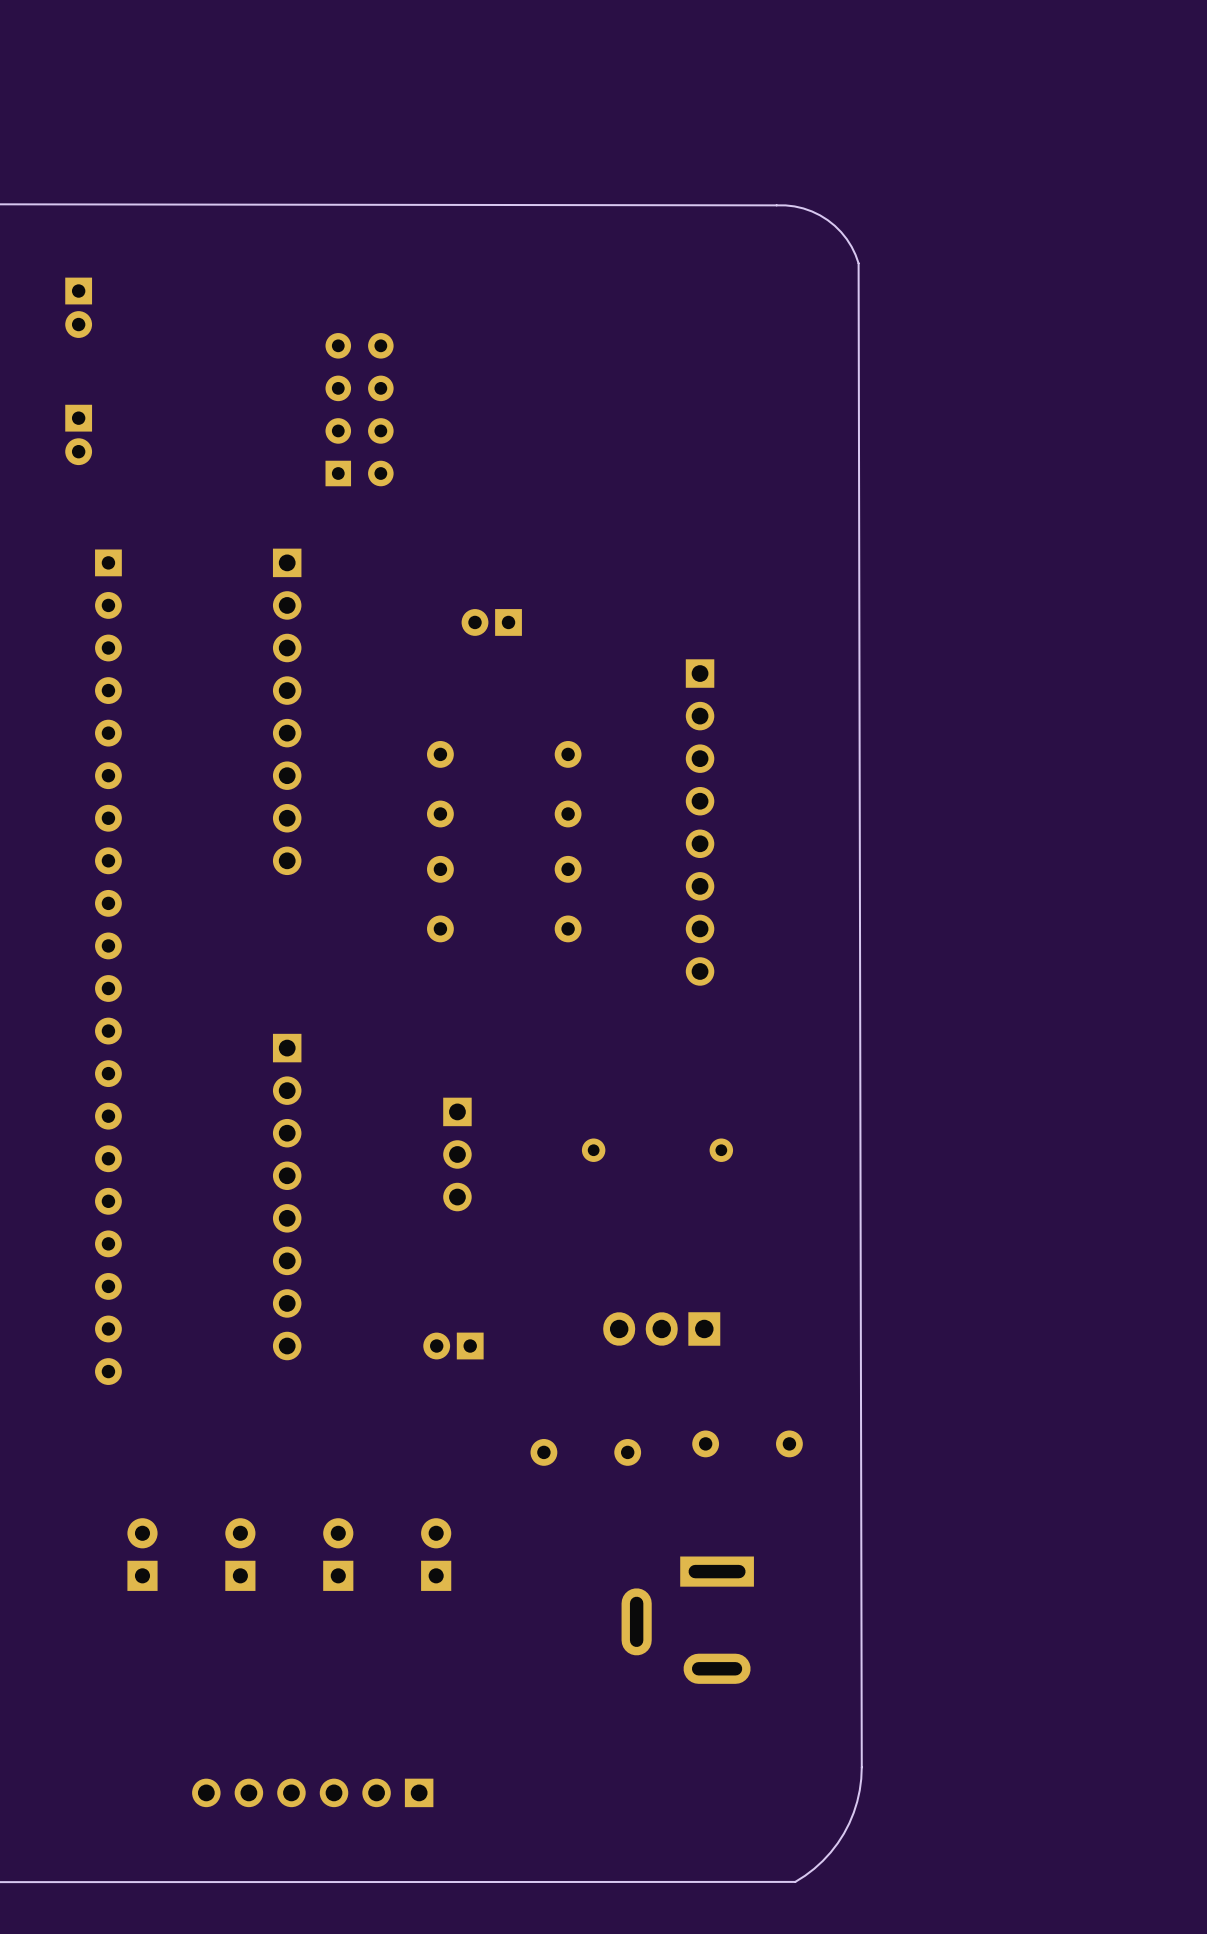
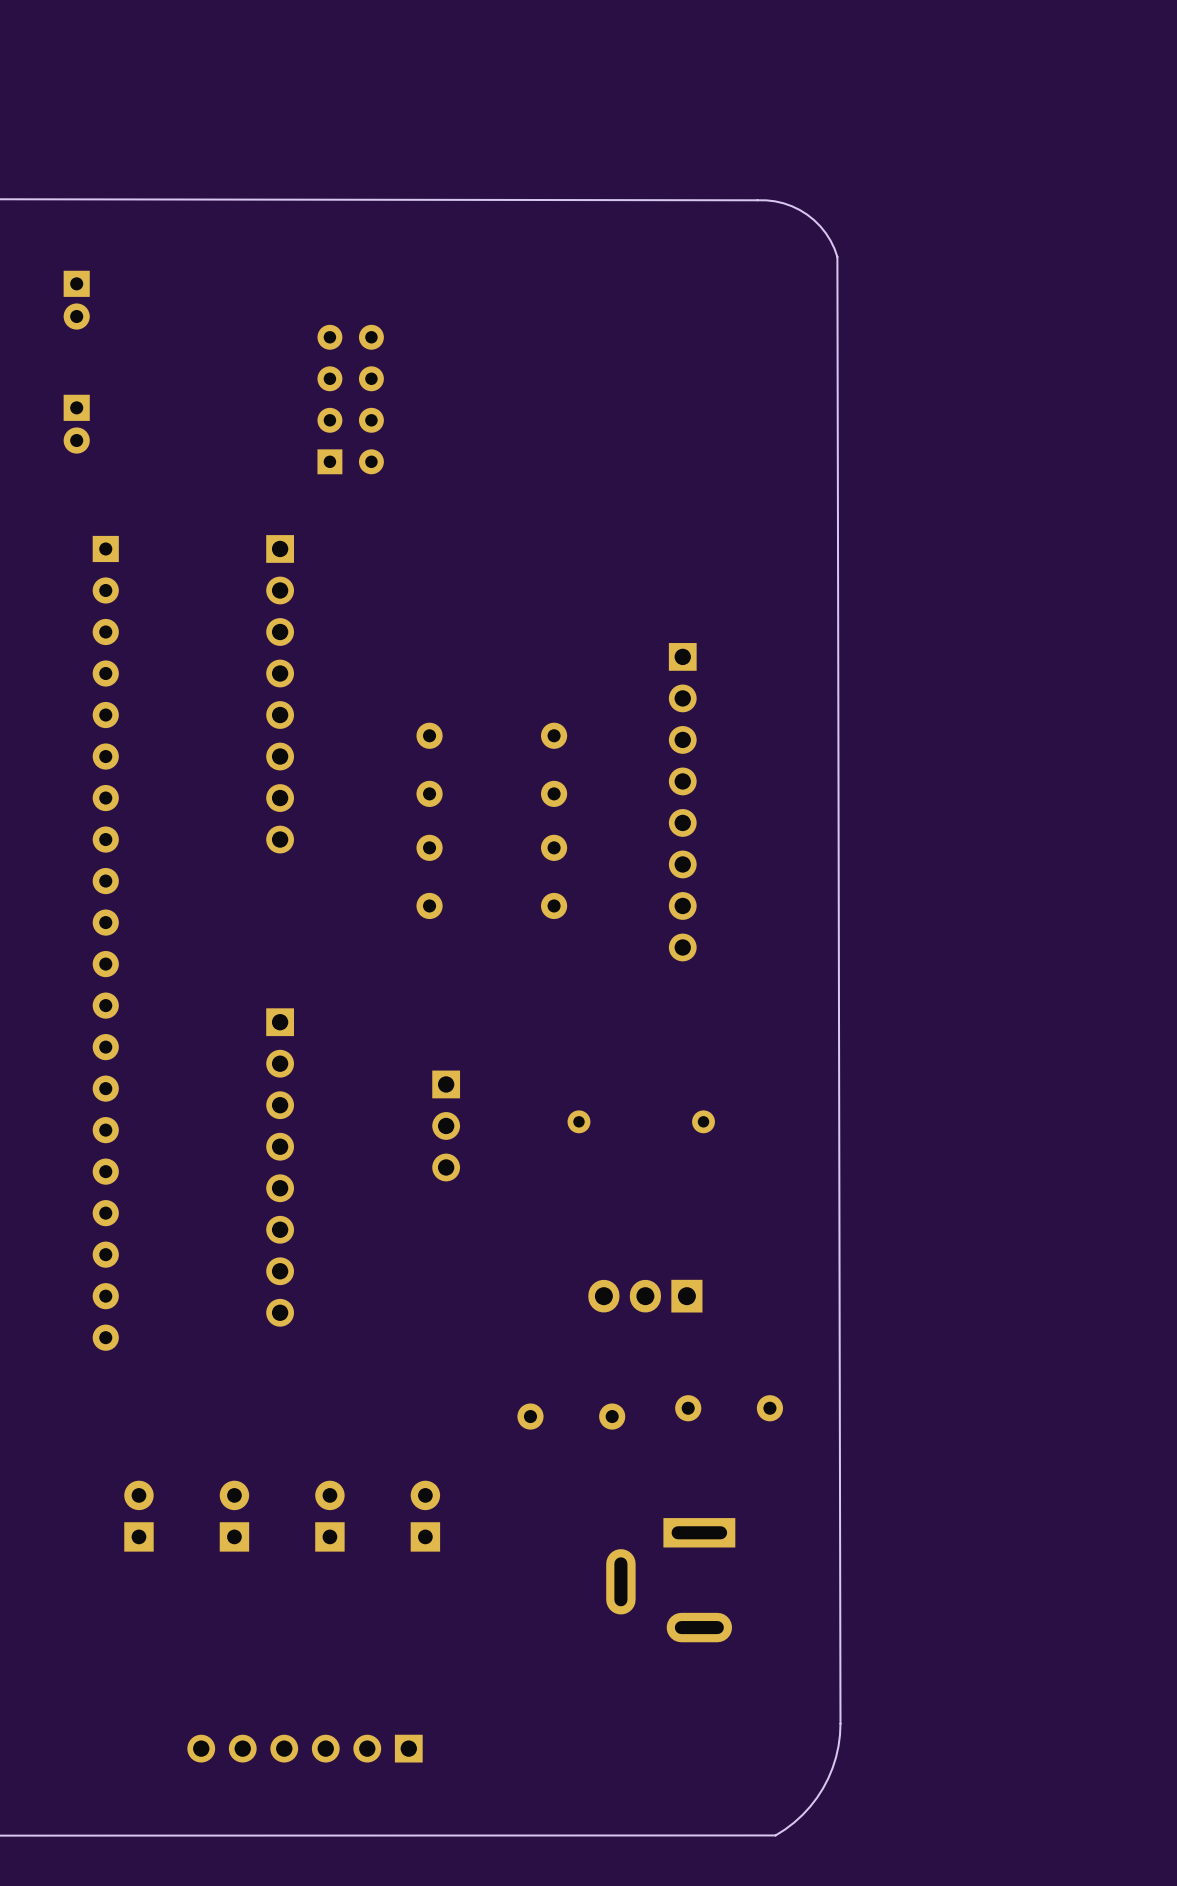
part: (491, 622) -> none
part: (453, 1346) -> none

